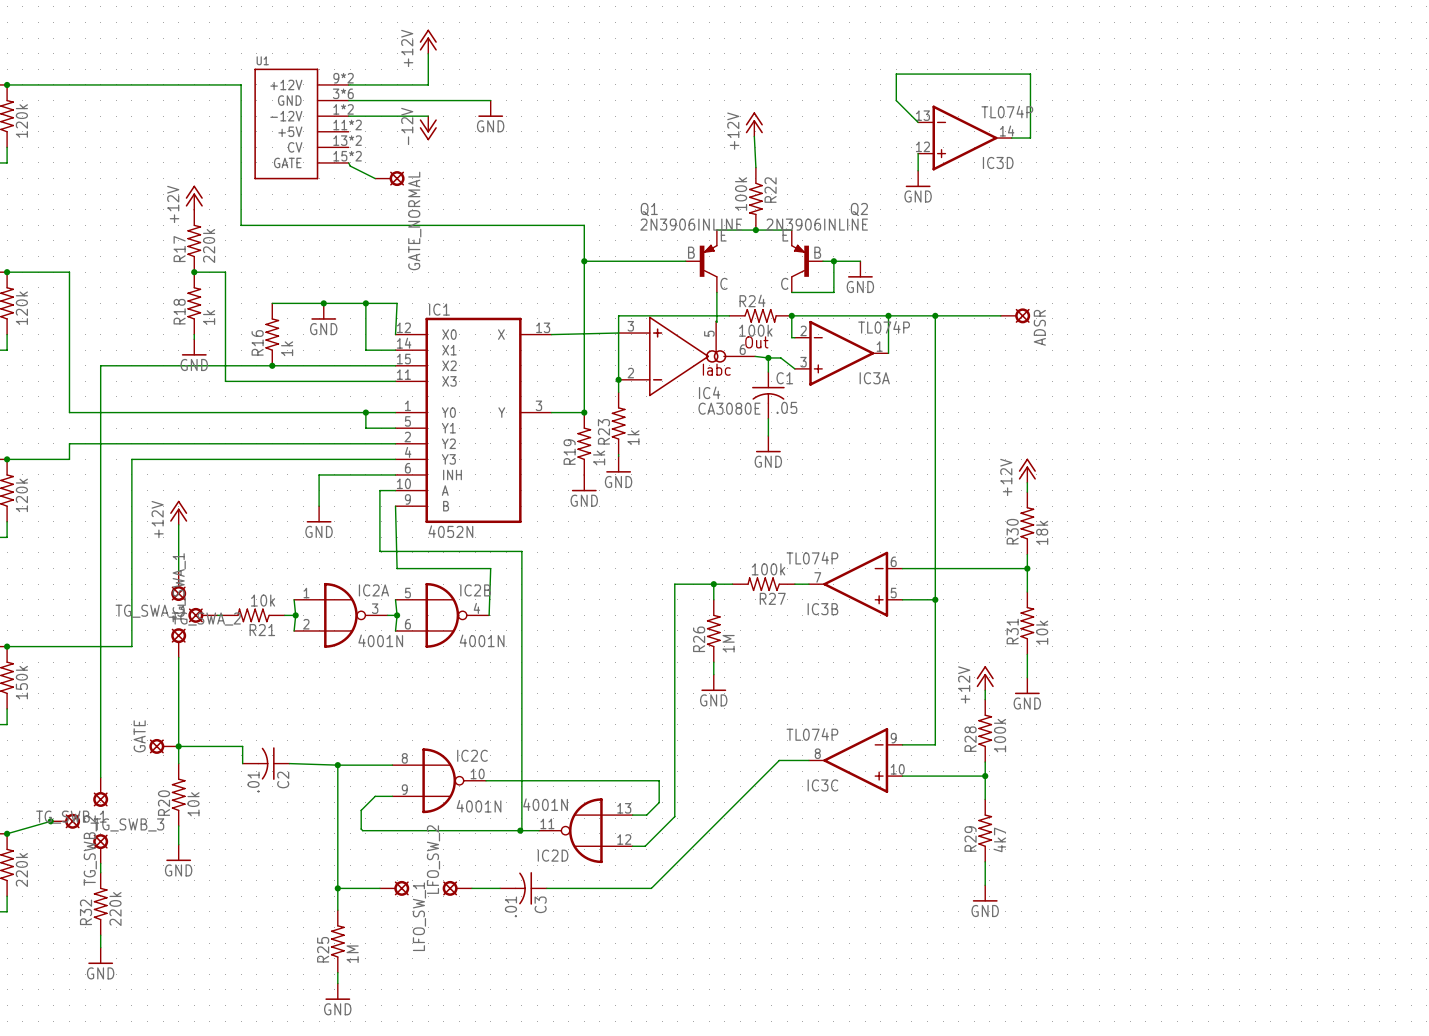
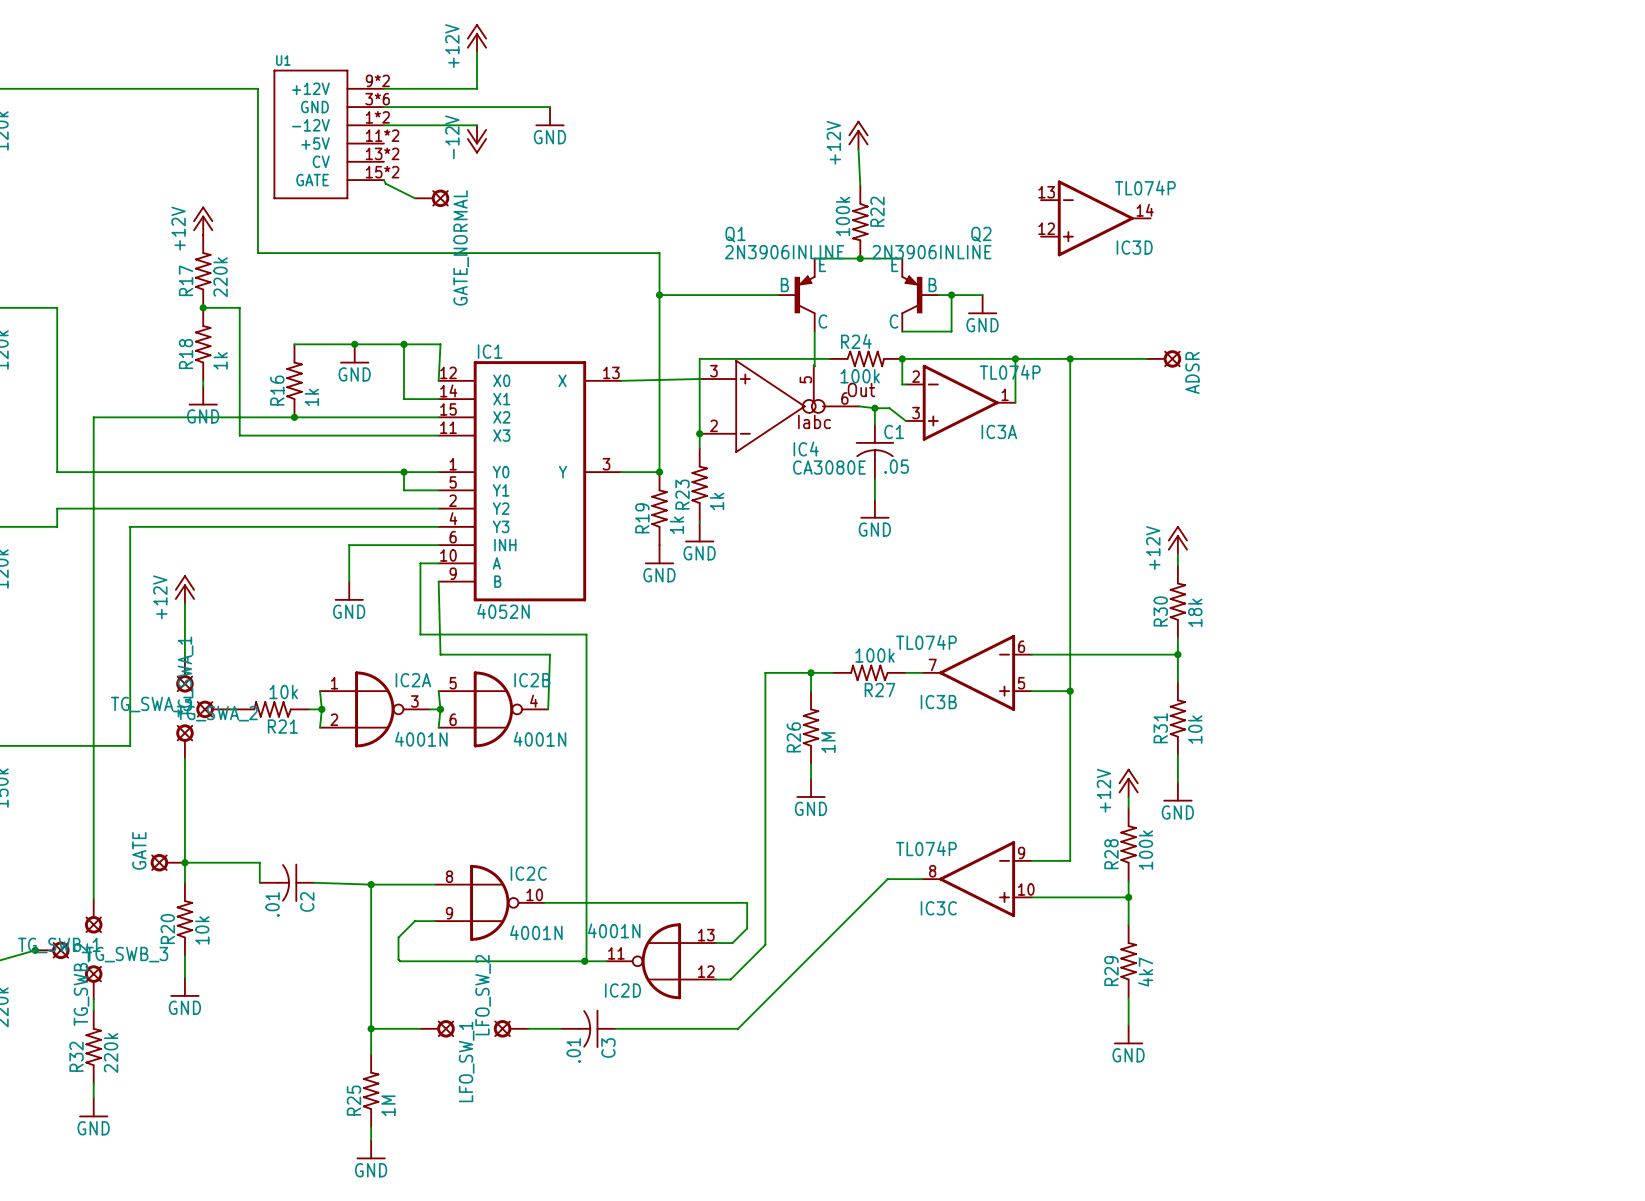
wire: (918, 122) (896, 100) (896, 74) (1030, 74) (1030, 138) (1011, 138) -> none
IC3D position: (964, 138) -> (1095, 218)
wire: (918, 153) (918, 170) -> none
power symbol: GND (918, 178) -> none

